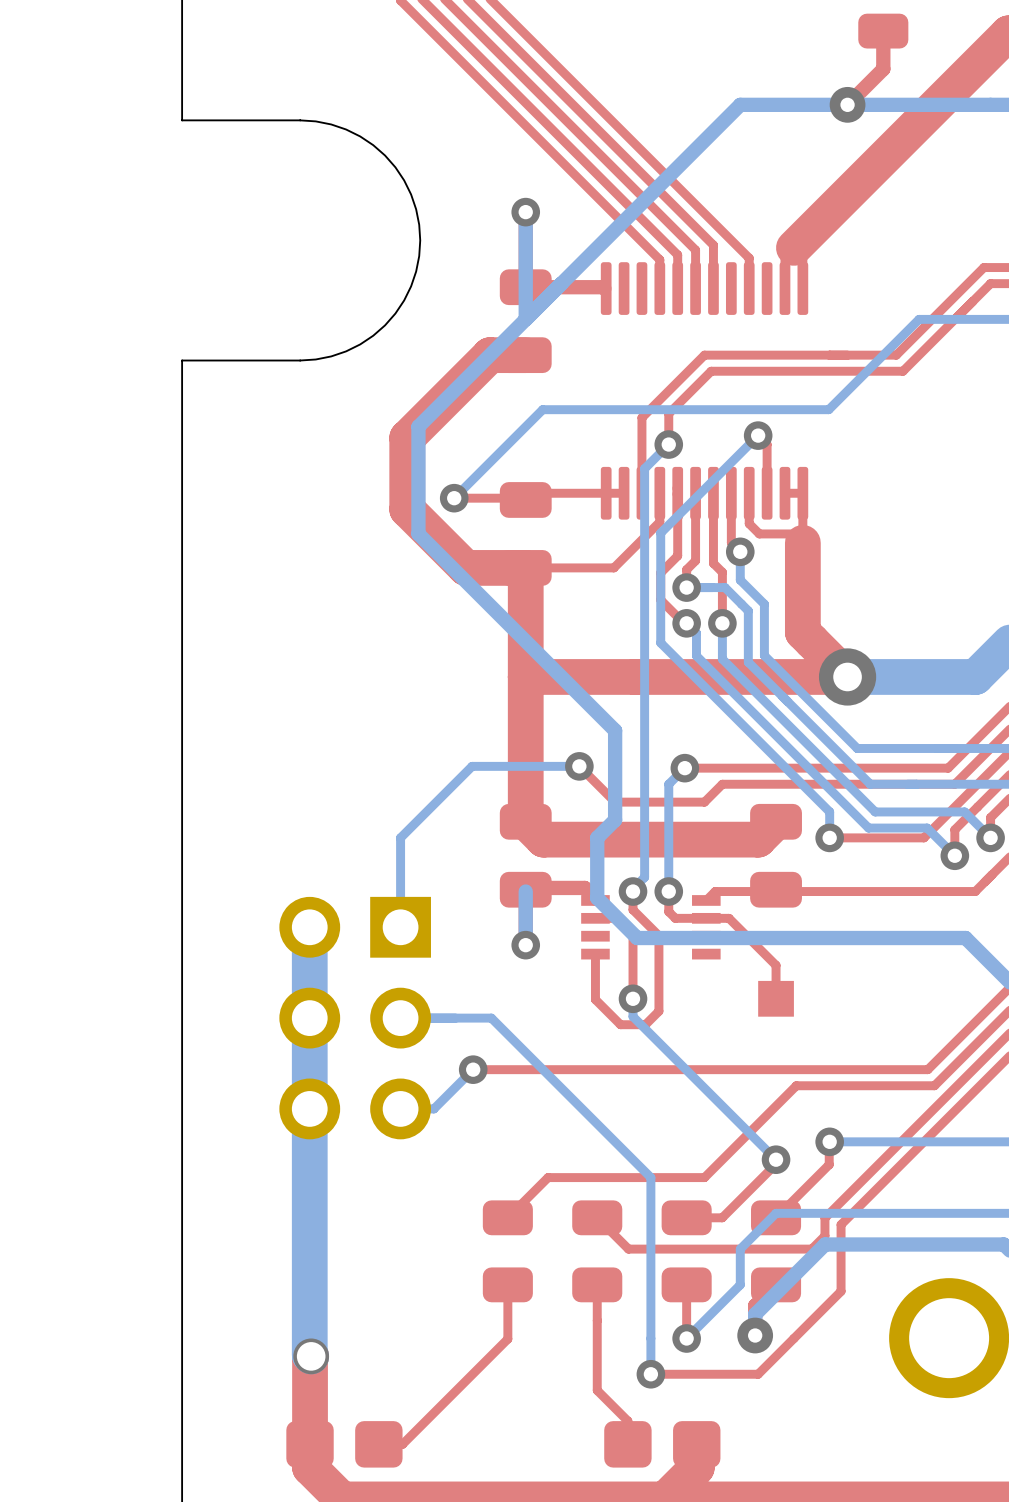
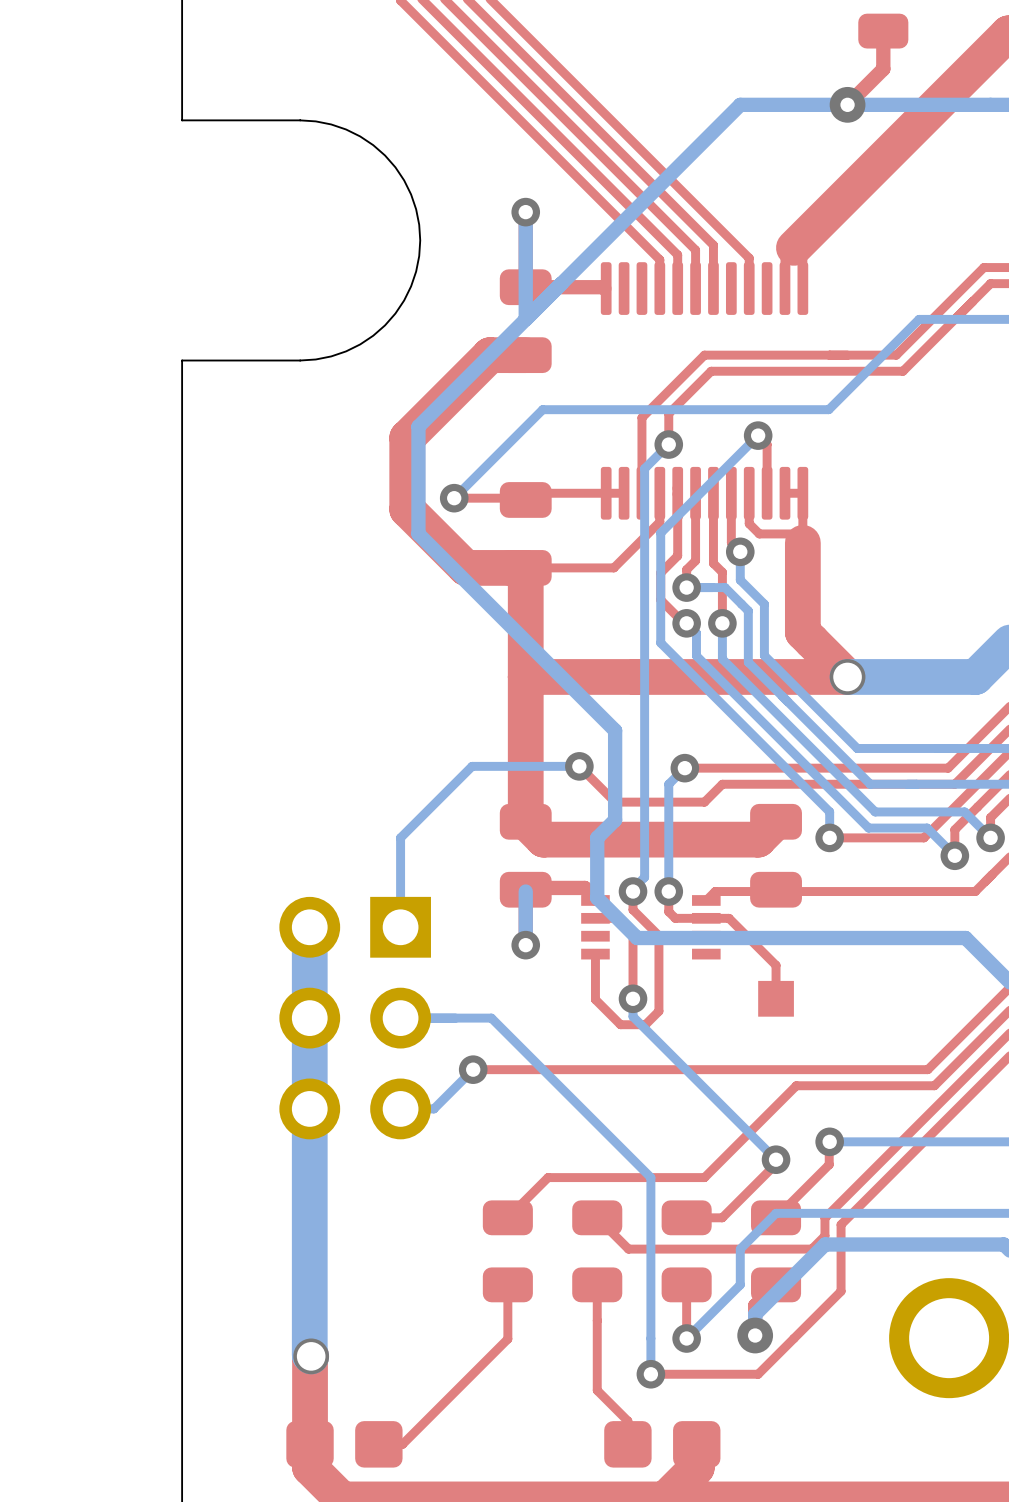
via size: [818, 648, 877, 706] -> [829, 659, 866, 695]

